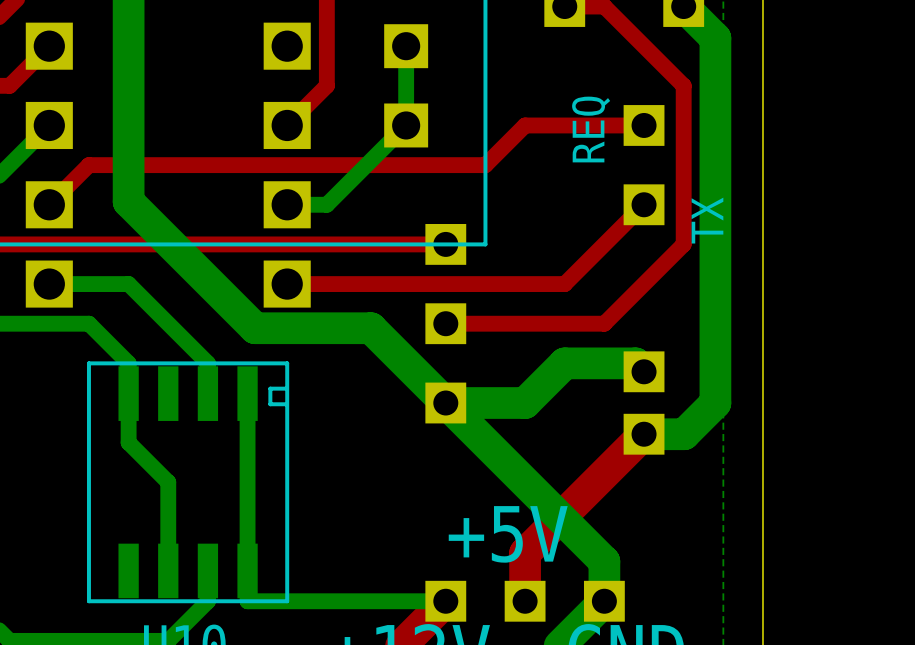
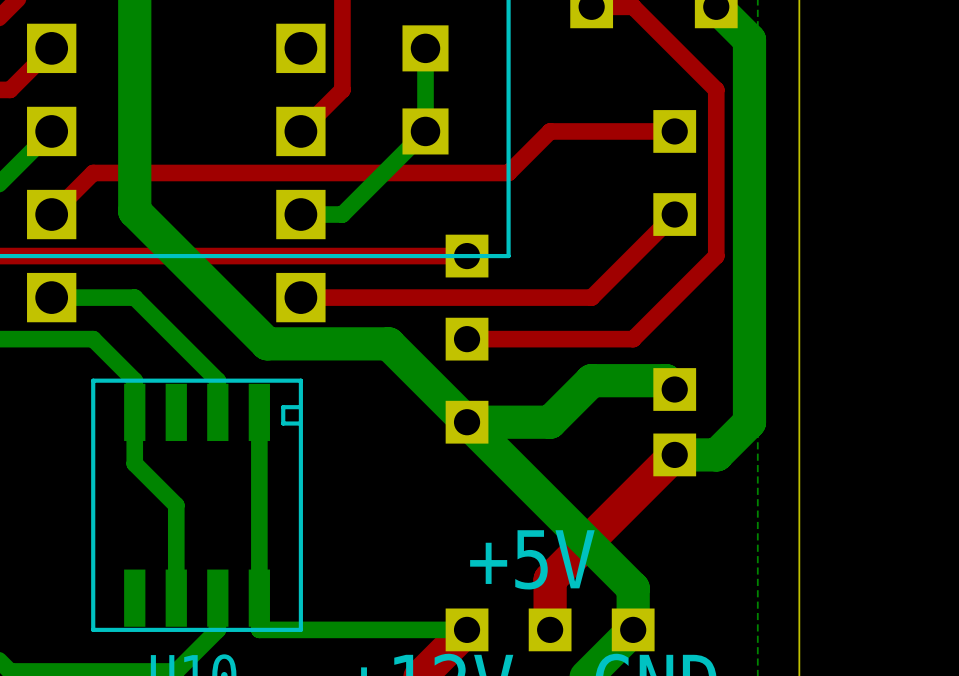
text: REQ (591, 129) -> none
text: TX (707, 220) -> none

